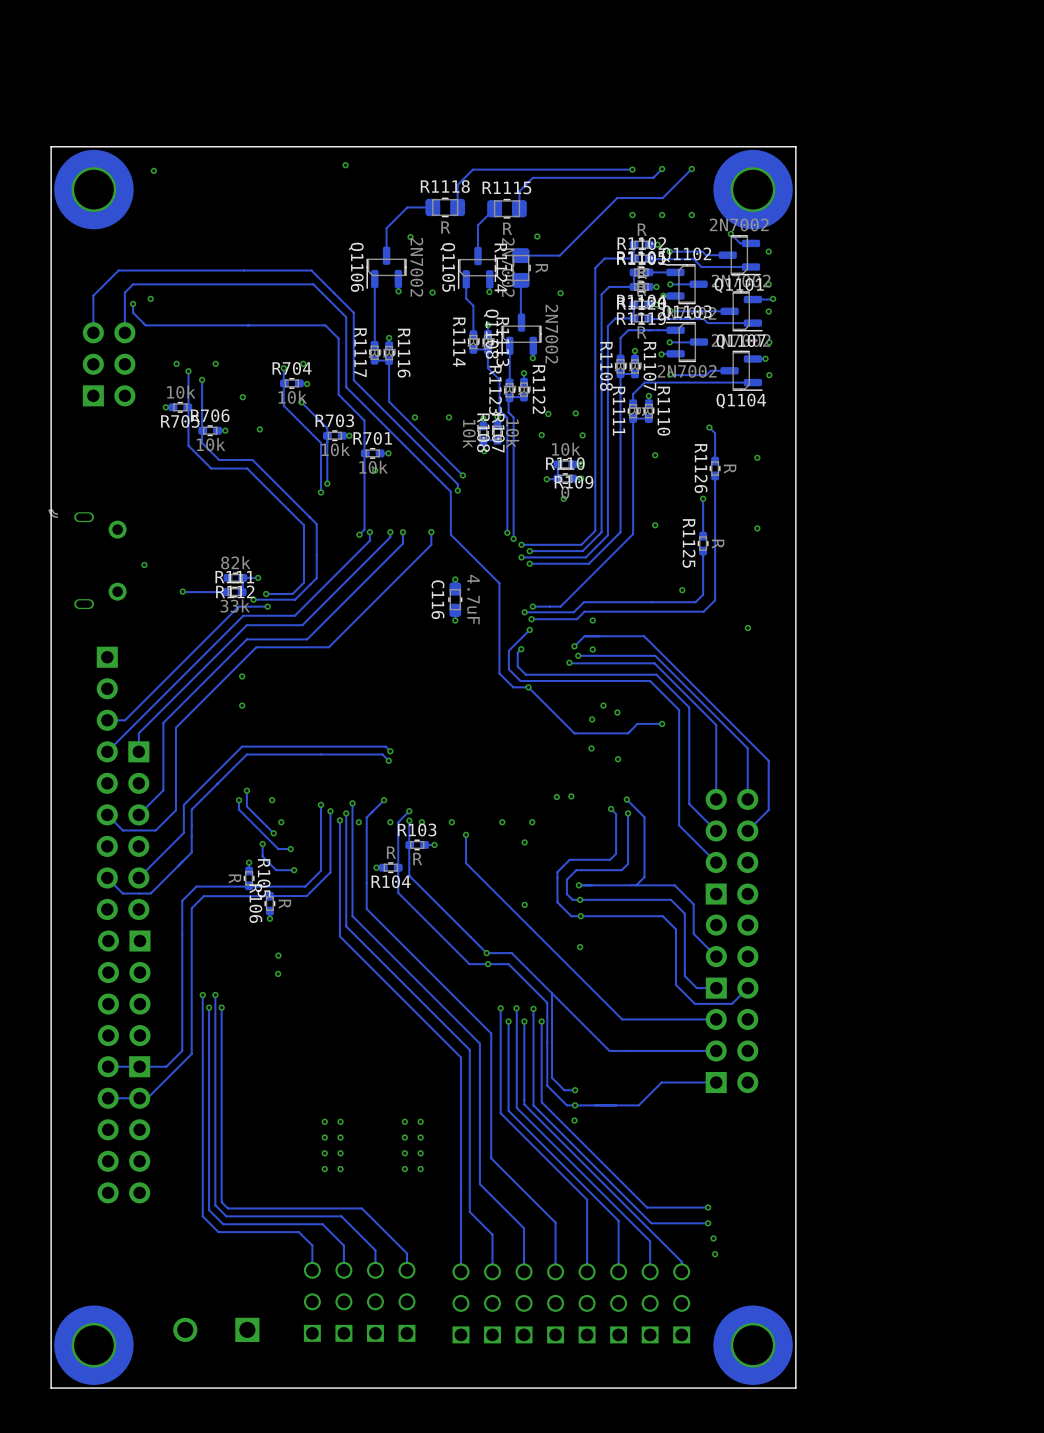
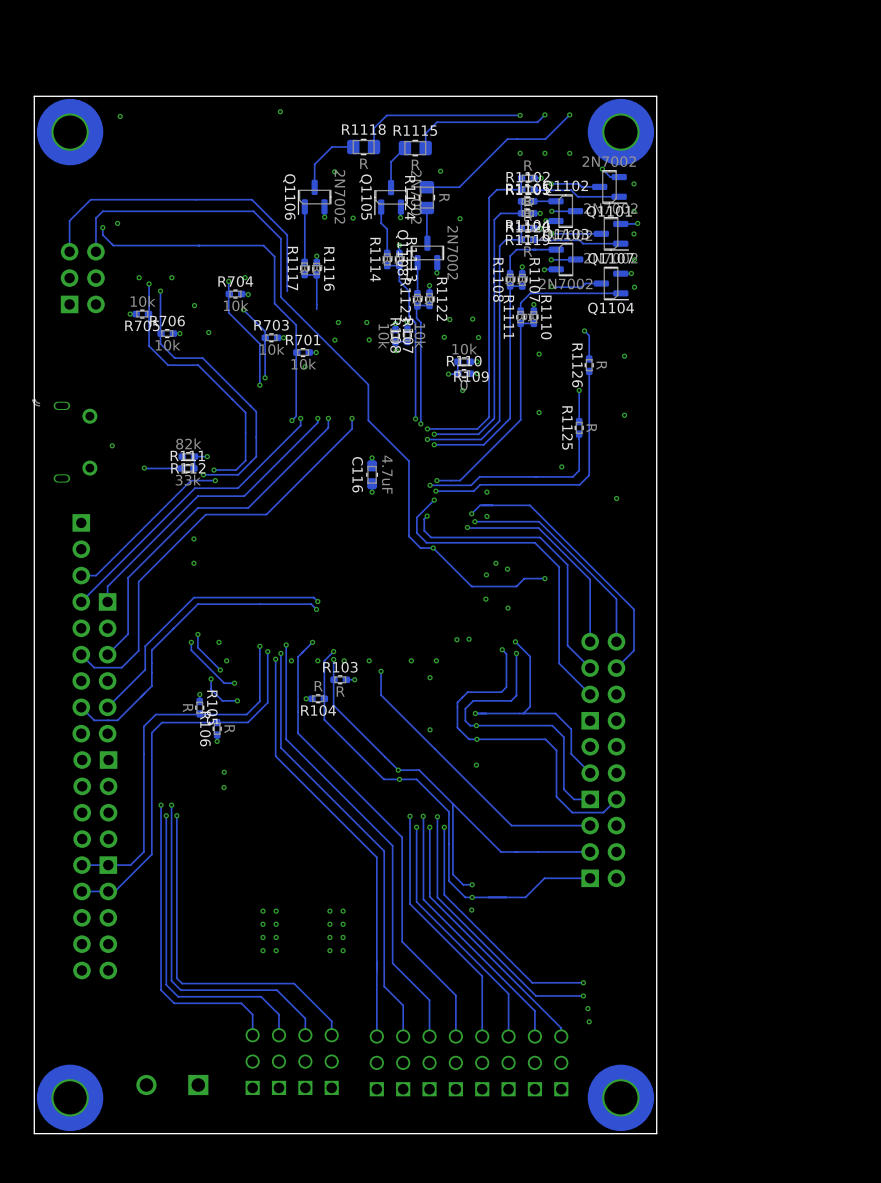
track: (353, 380) (457, 484) (457, 490) -> none
track: (389, 401) (462, 475) -> none
via: none -> (334, 340)
via: none -> (369, 339)
via: (462, 475) -> none
via: (457, 490) -> none

